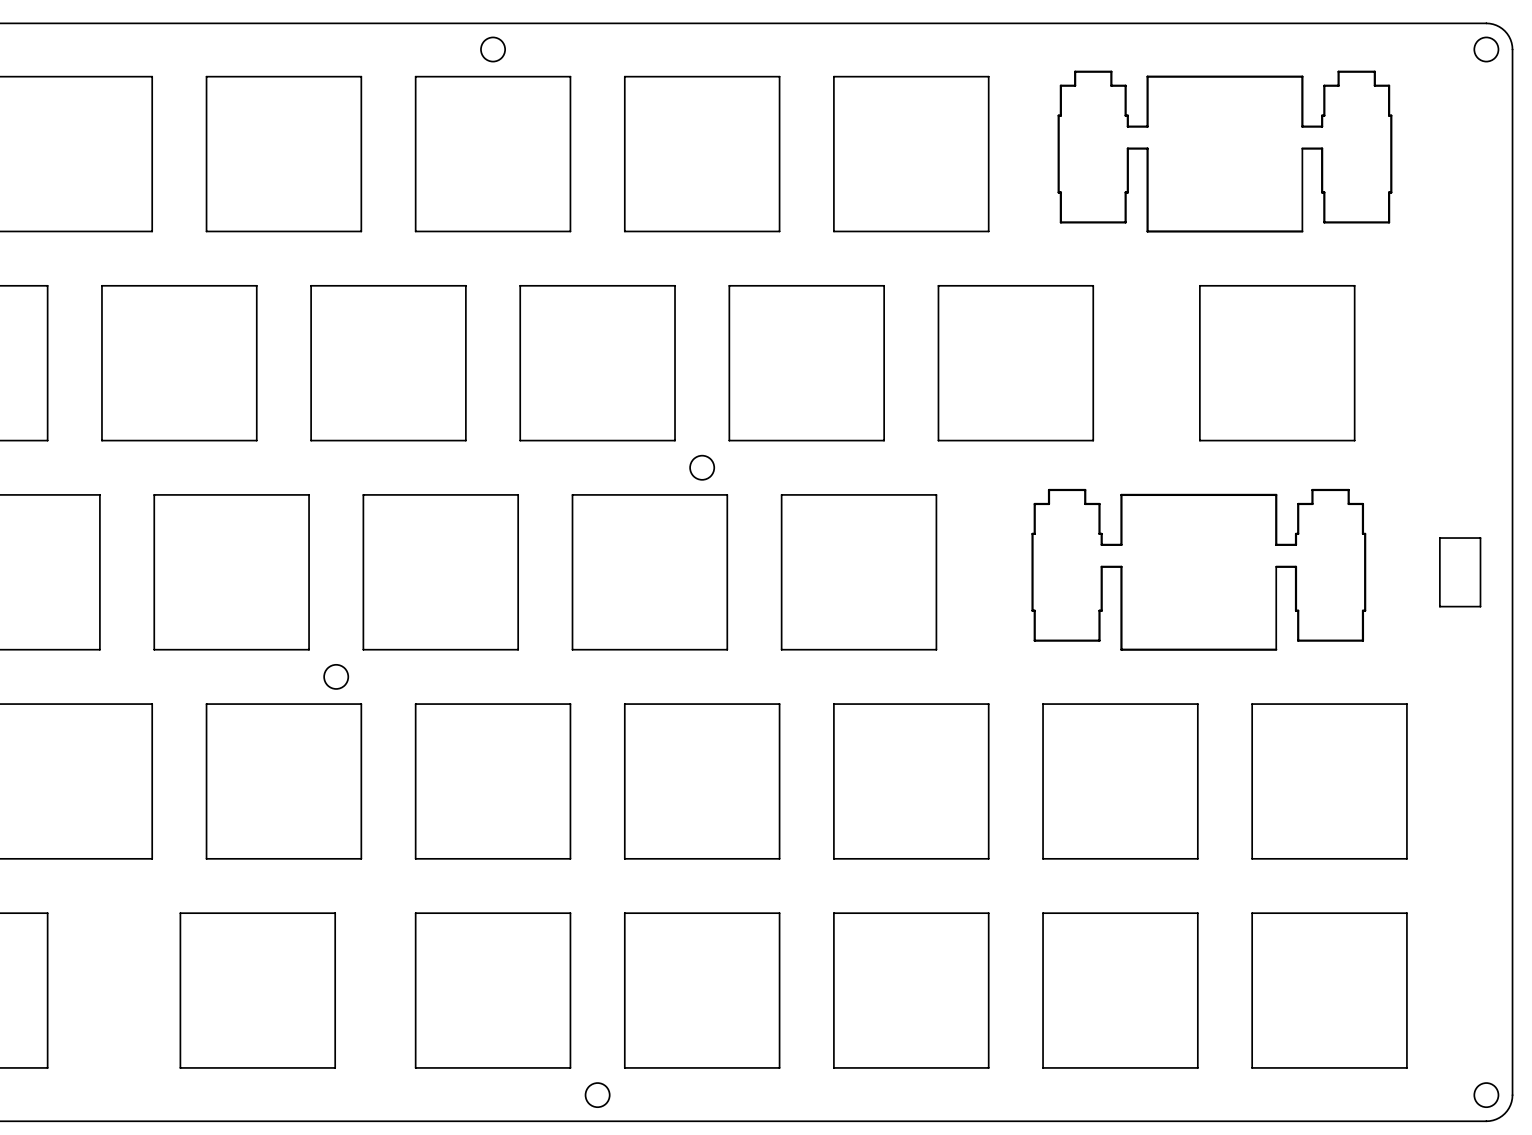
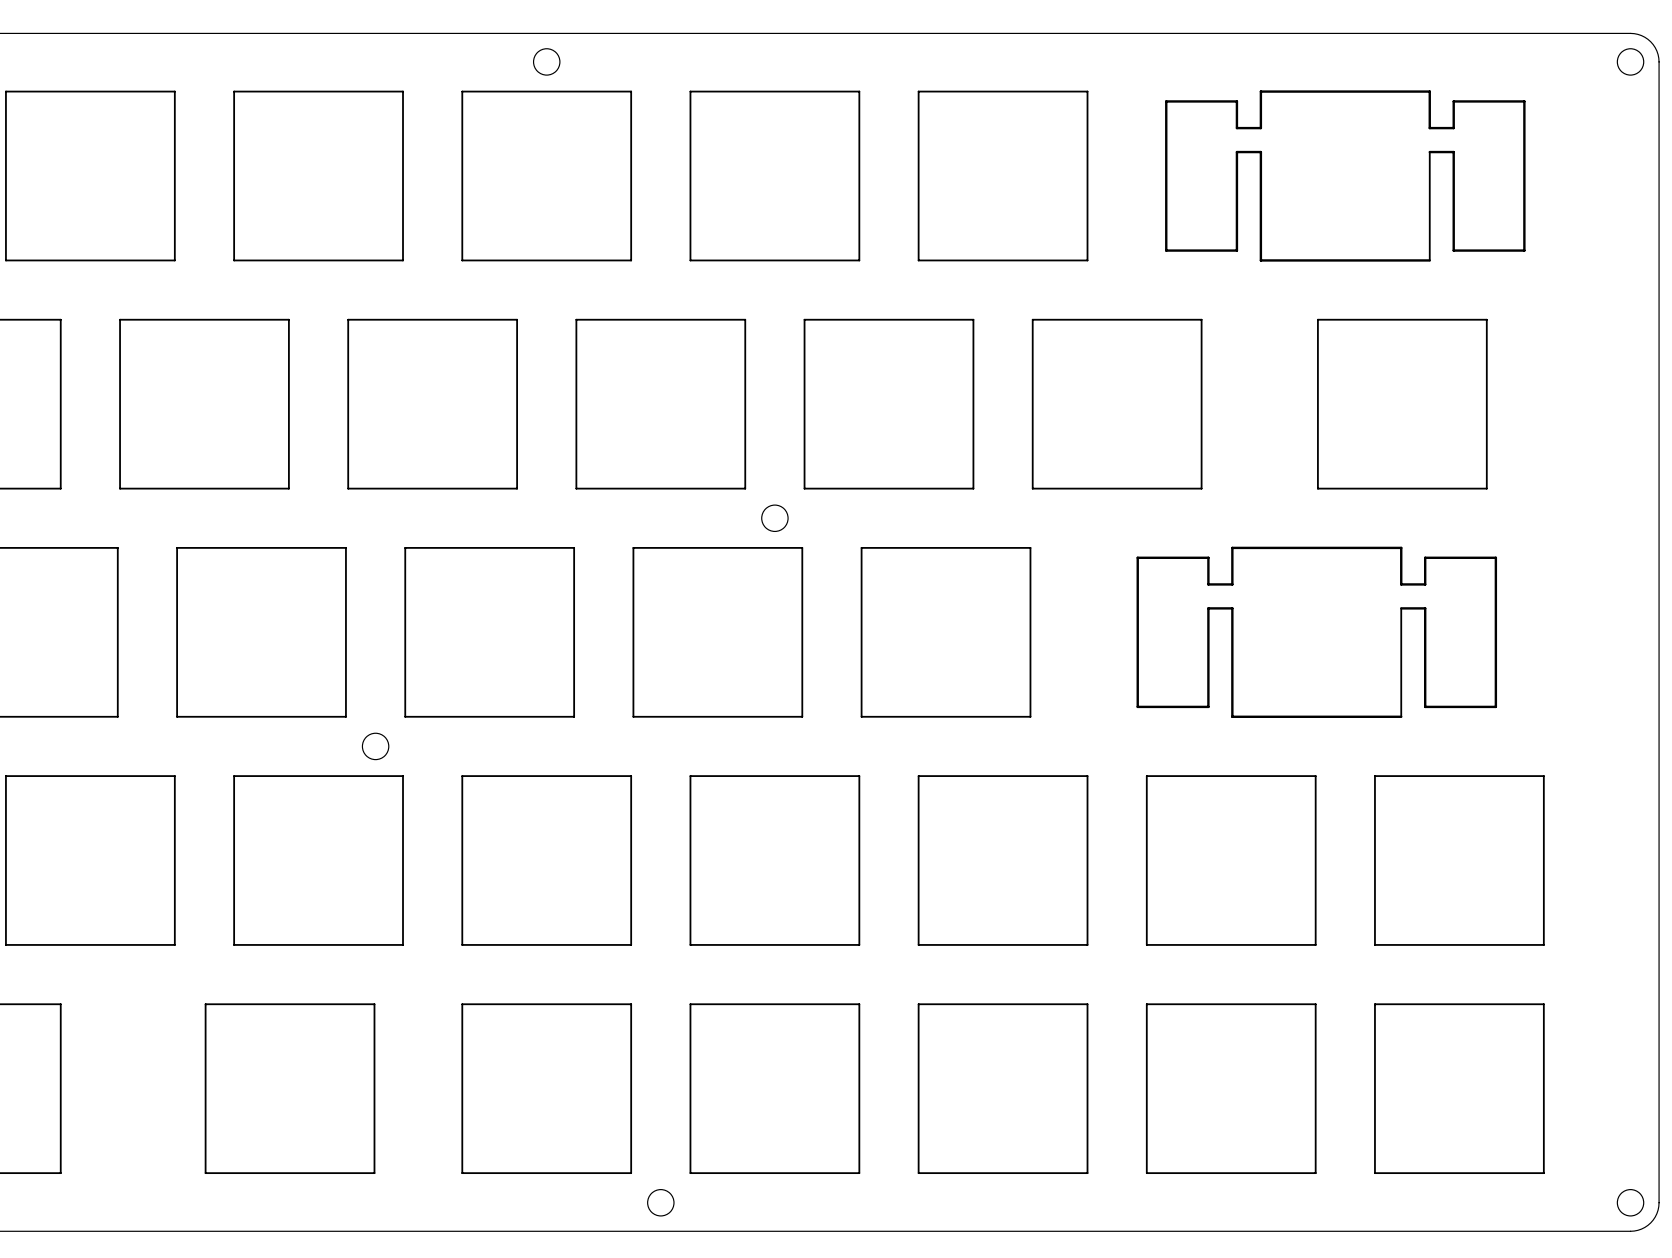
drawing shape: [1057, 70, 1393, 233] -> [1165, 90, 1526, 262]
drawing shape: [1031, 488, 1367, 651] -> [1136, 546, 1498, 718]
board edge: (1439, 538) (1439, 606) (1480, 606) (1480, 538) (1439, 538) -> none

